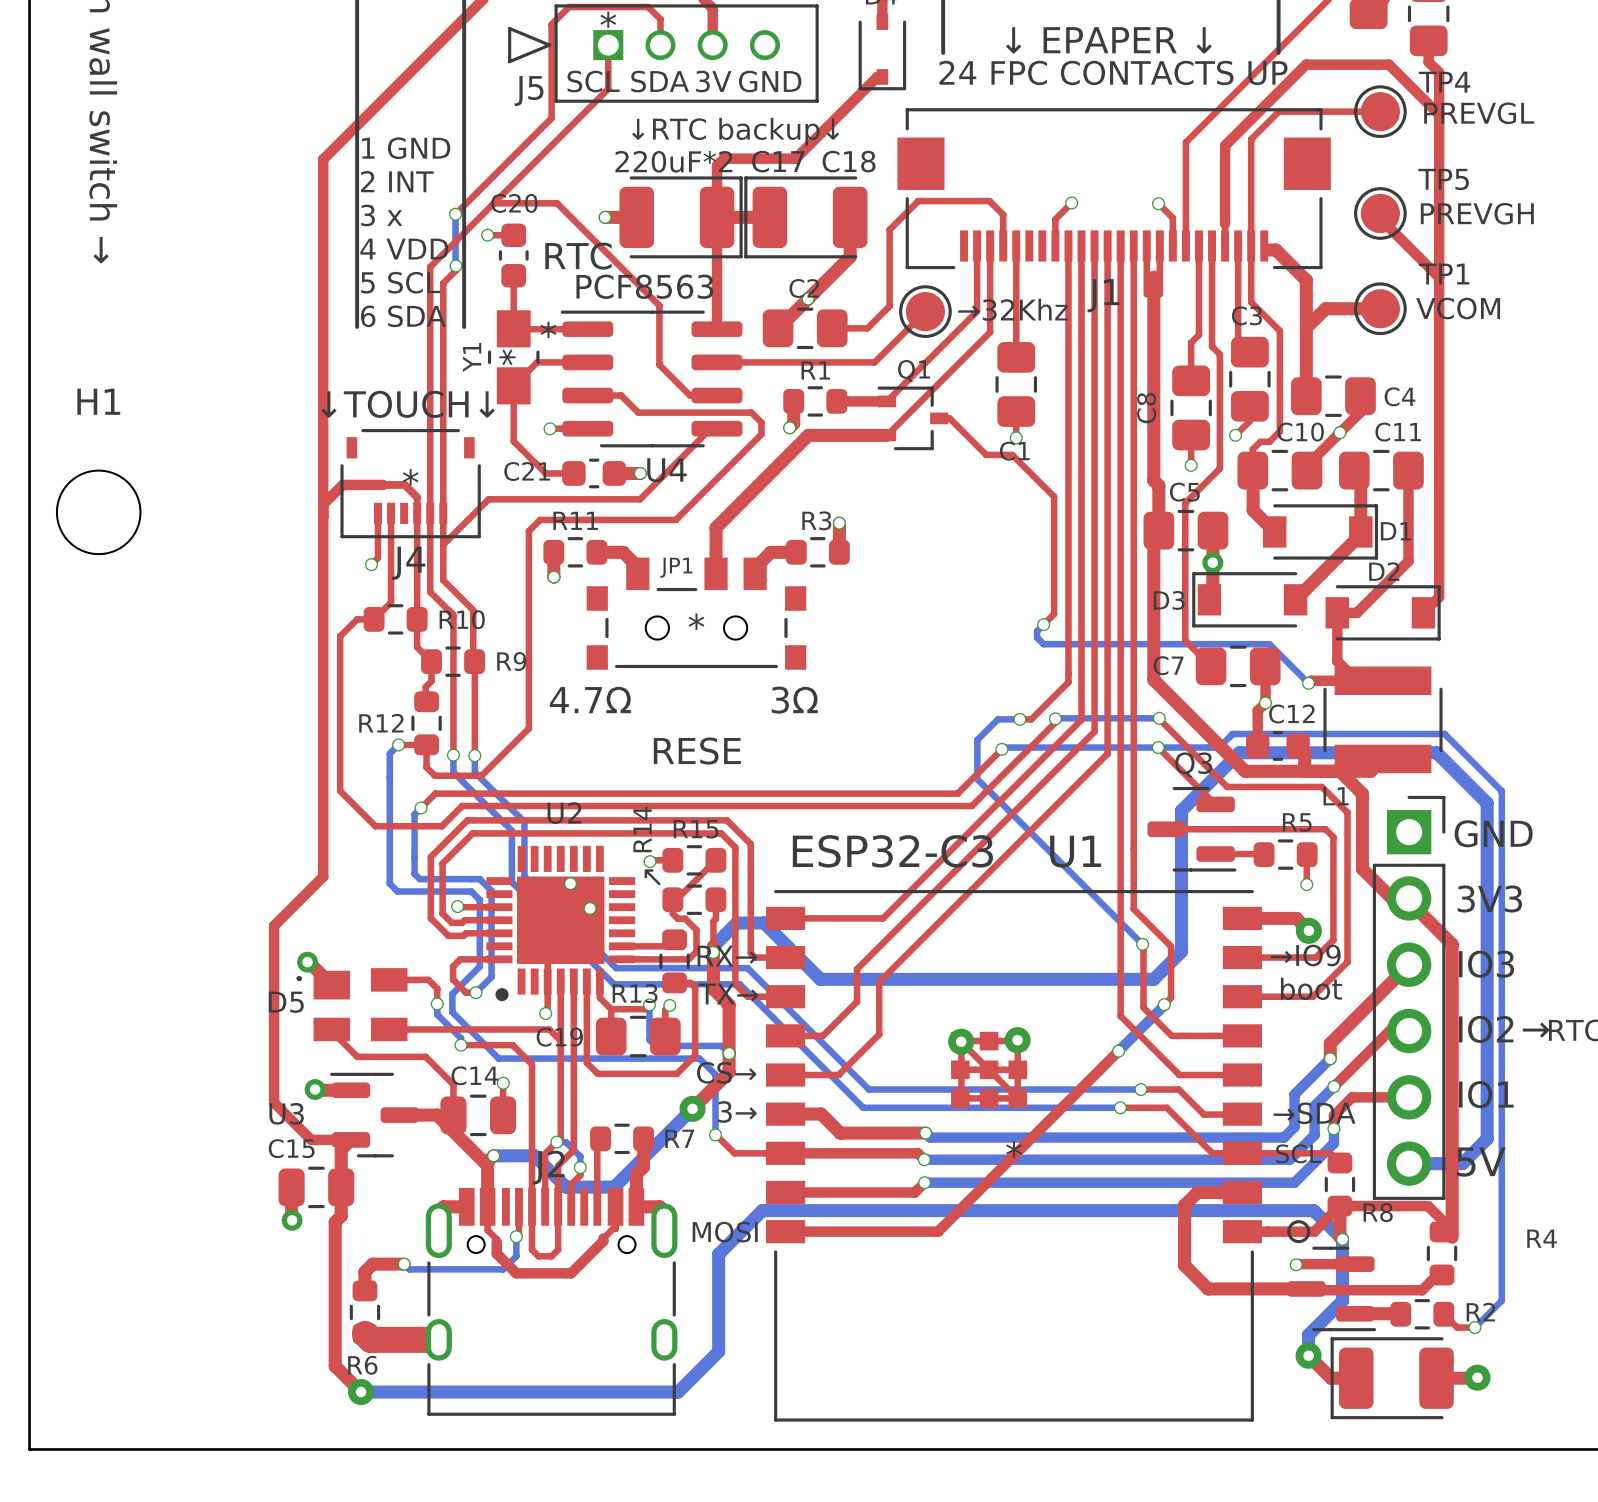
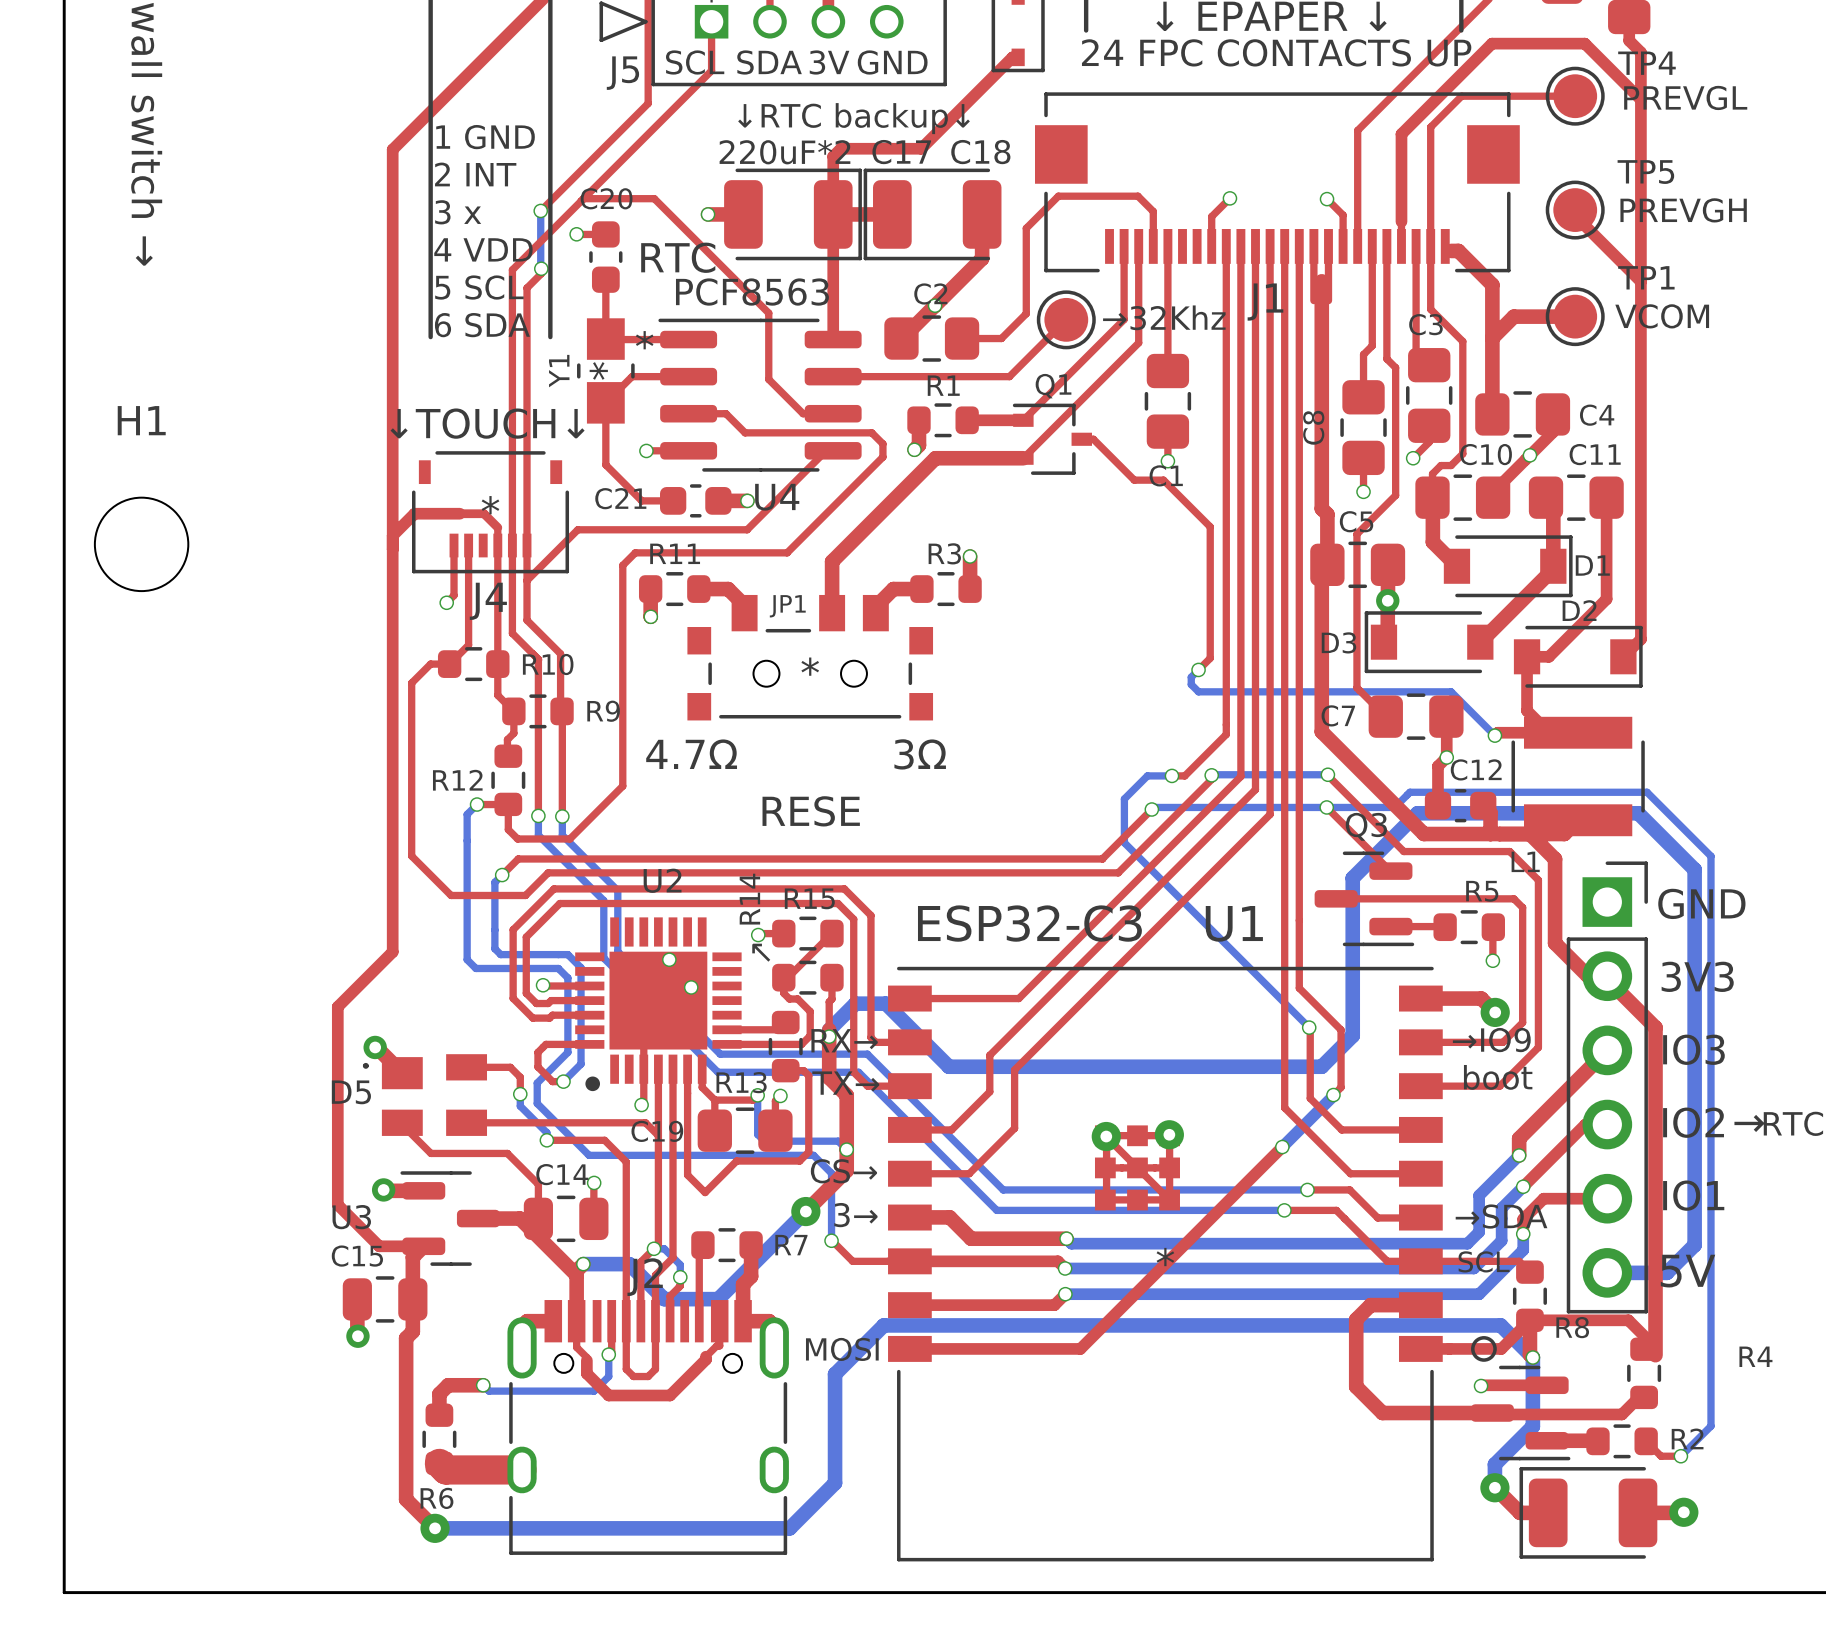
top track: (586, 1062) (597, 1073) (676, 1073) (687, 1063) -> (687, 1160) (687, 1175) (705, 1192) (736, 1161) (799, 1161)

